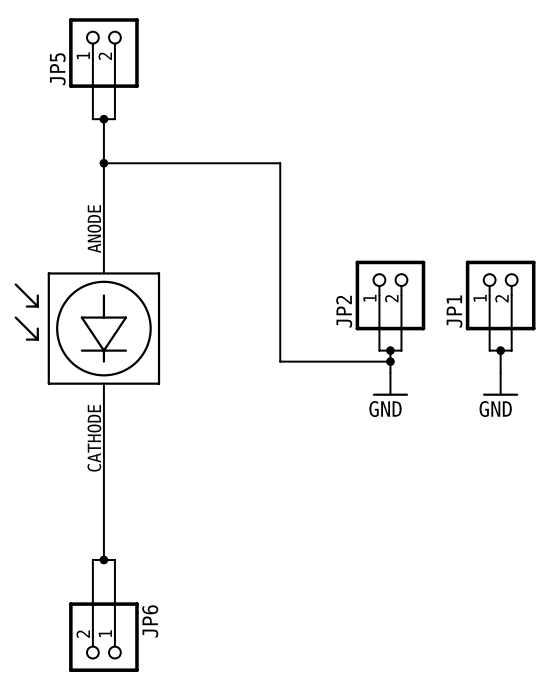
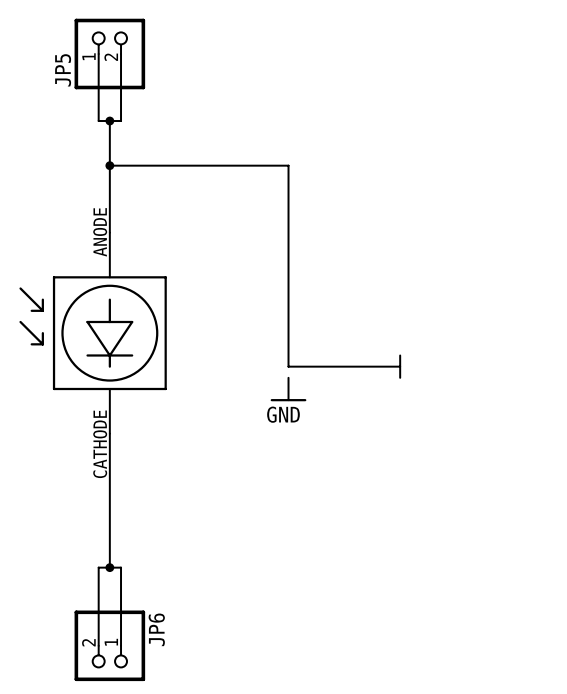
wire: (379, 295) (379, 350) (401, 350) (401, 295) -> none
JP2: (390, 295) -> none
wire: (489, 295) (489, 350) (511, 350) (511, 295) -> none
JP1: (500, 295) -> none
junction: (390, 350) -> none
wire: (500, 350) (500, 372) -> none
junction: (500, 350) -> none
junction: (390, 361) -> none
power symbol: none -> GND (288, 389)
power symbol: GND (390, 384) -> none
power symbol: GND (500, 384) -> none

